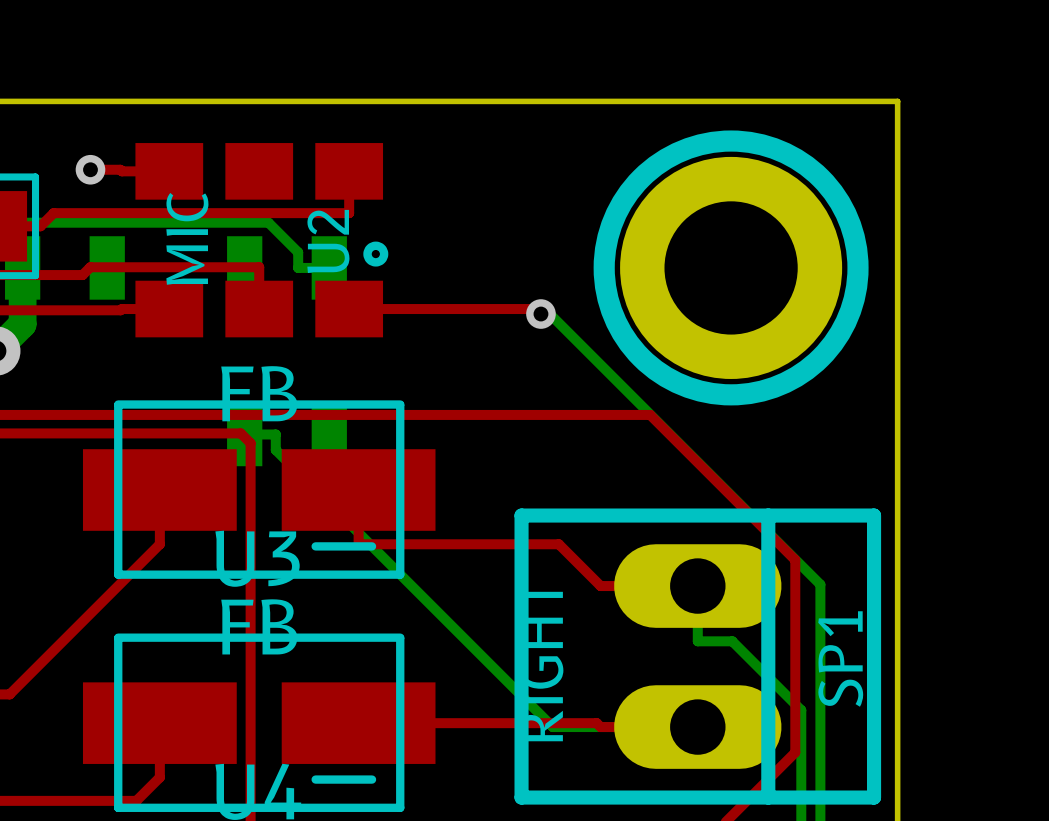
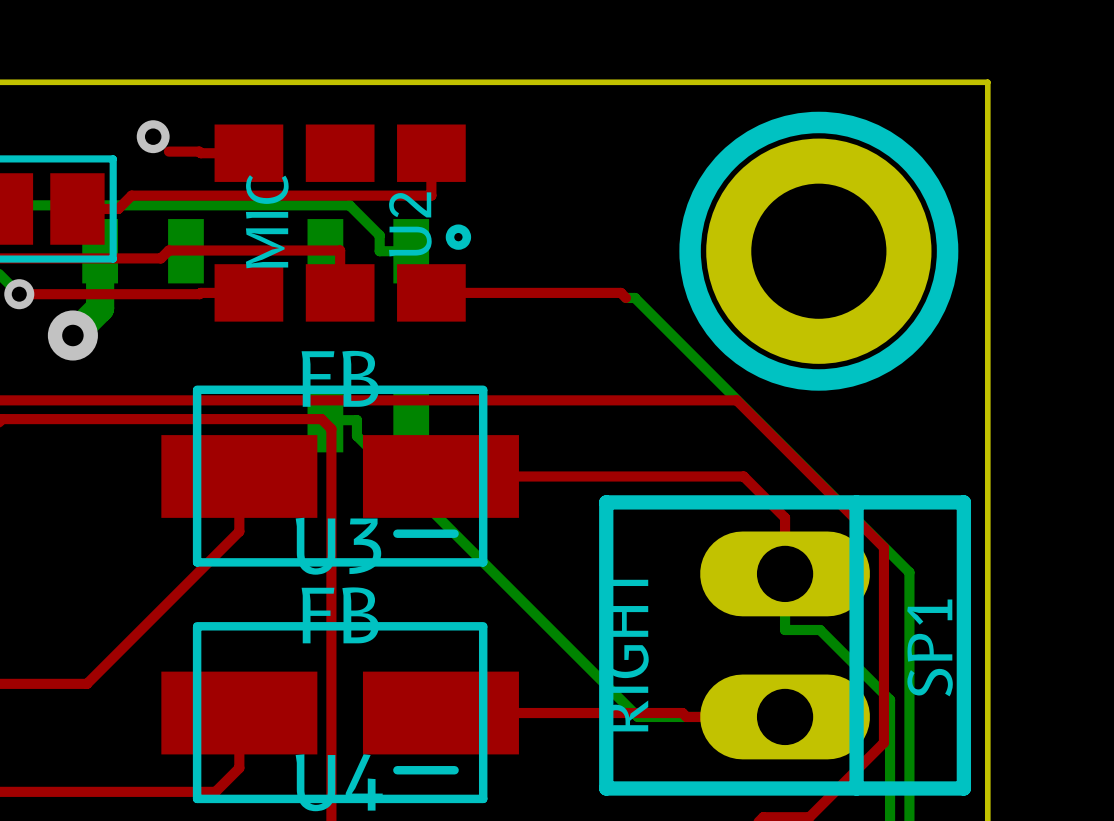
via position: (90, 169) -> (153, 136)
via: (540, 314) -> none
top track: (358, 490) (358, 544) (558, 544) (600, 586) (697, 586) -> (440, 476) (743, 476) (785, 517) (785, 573)

